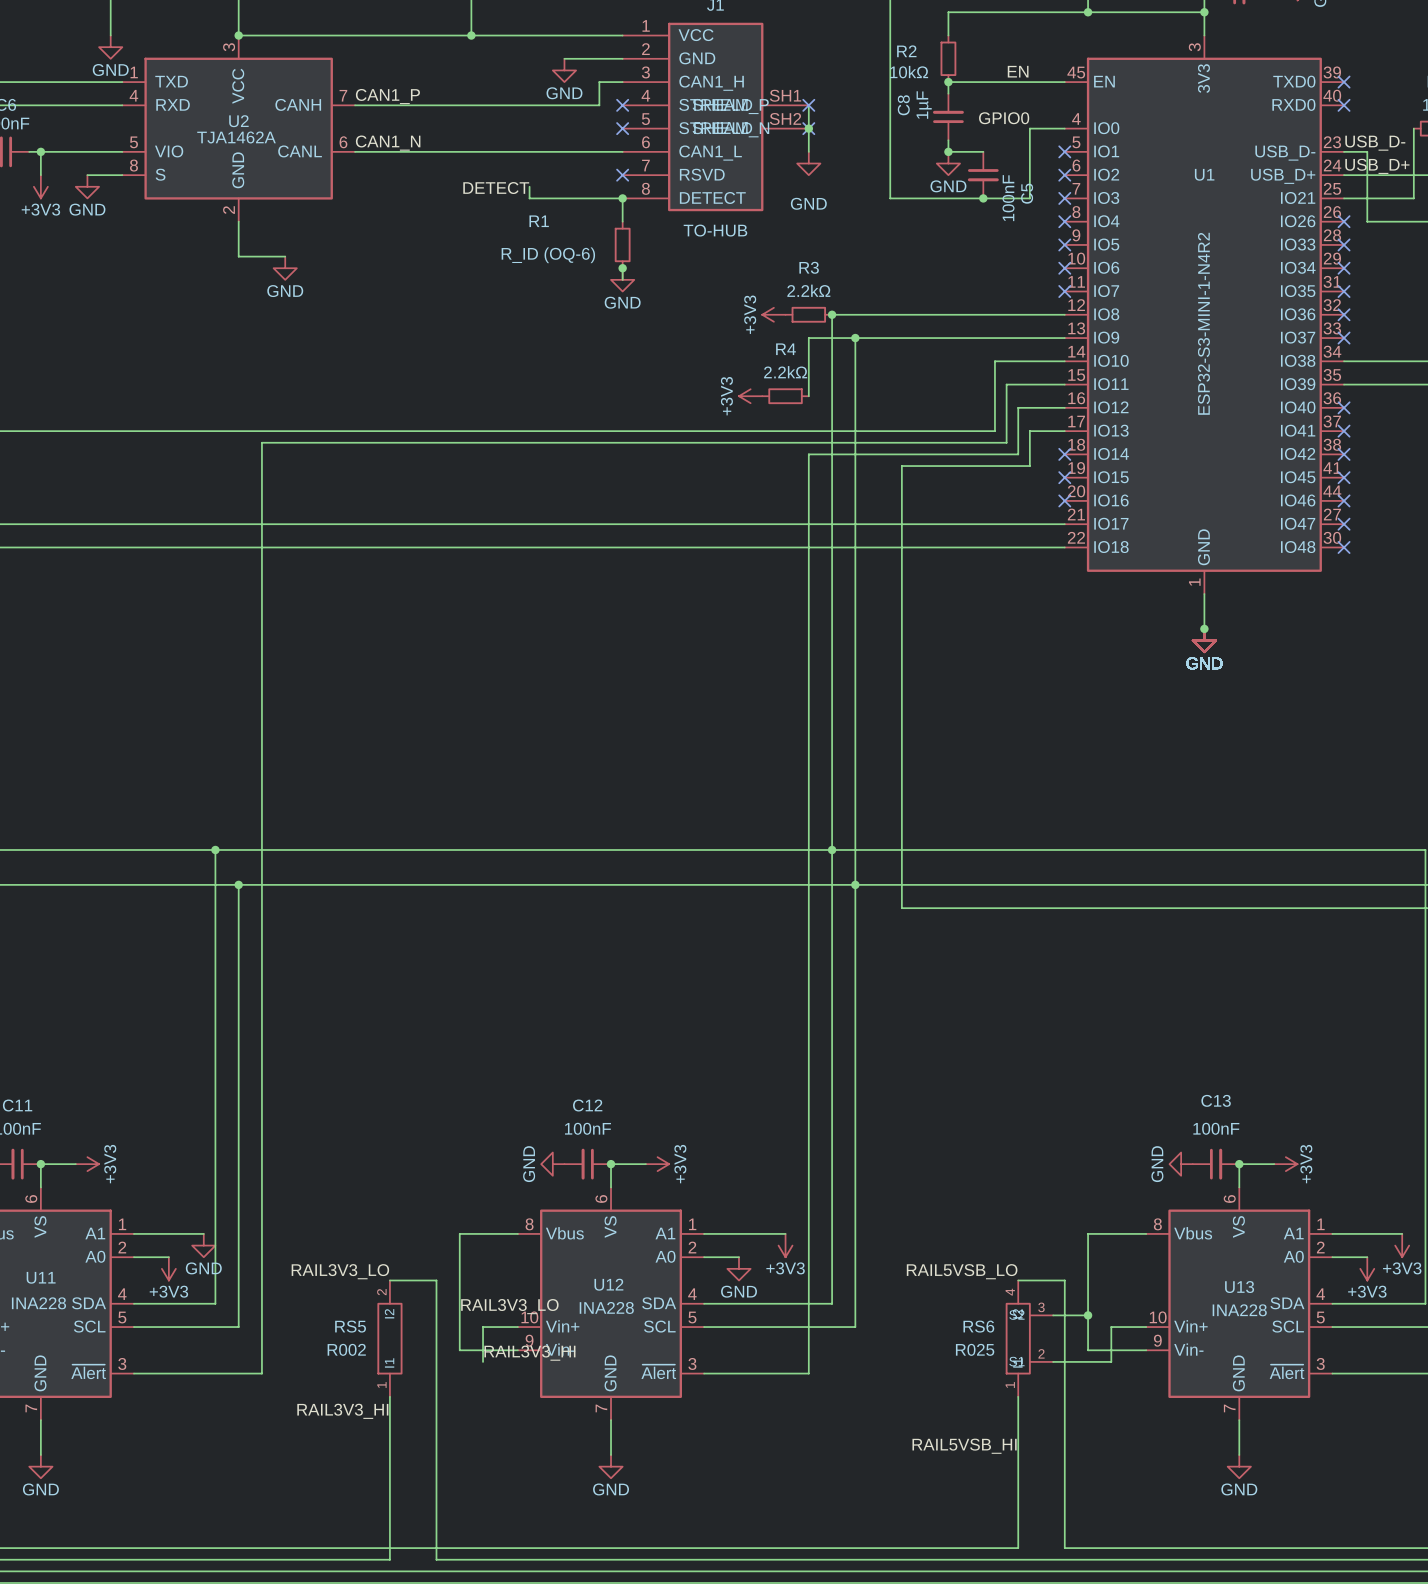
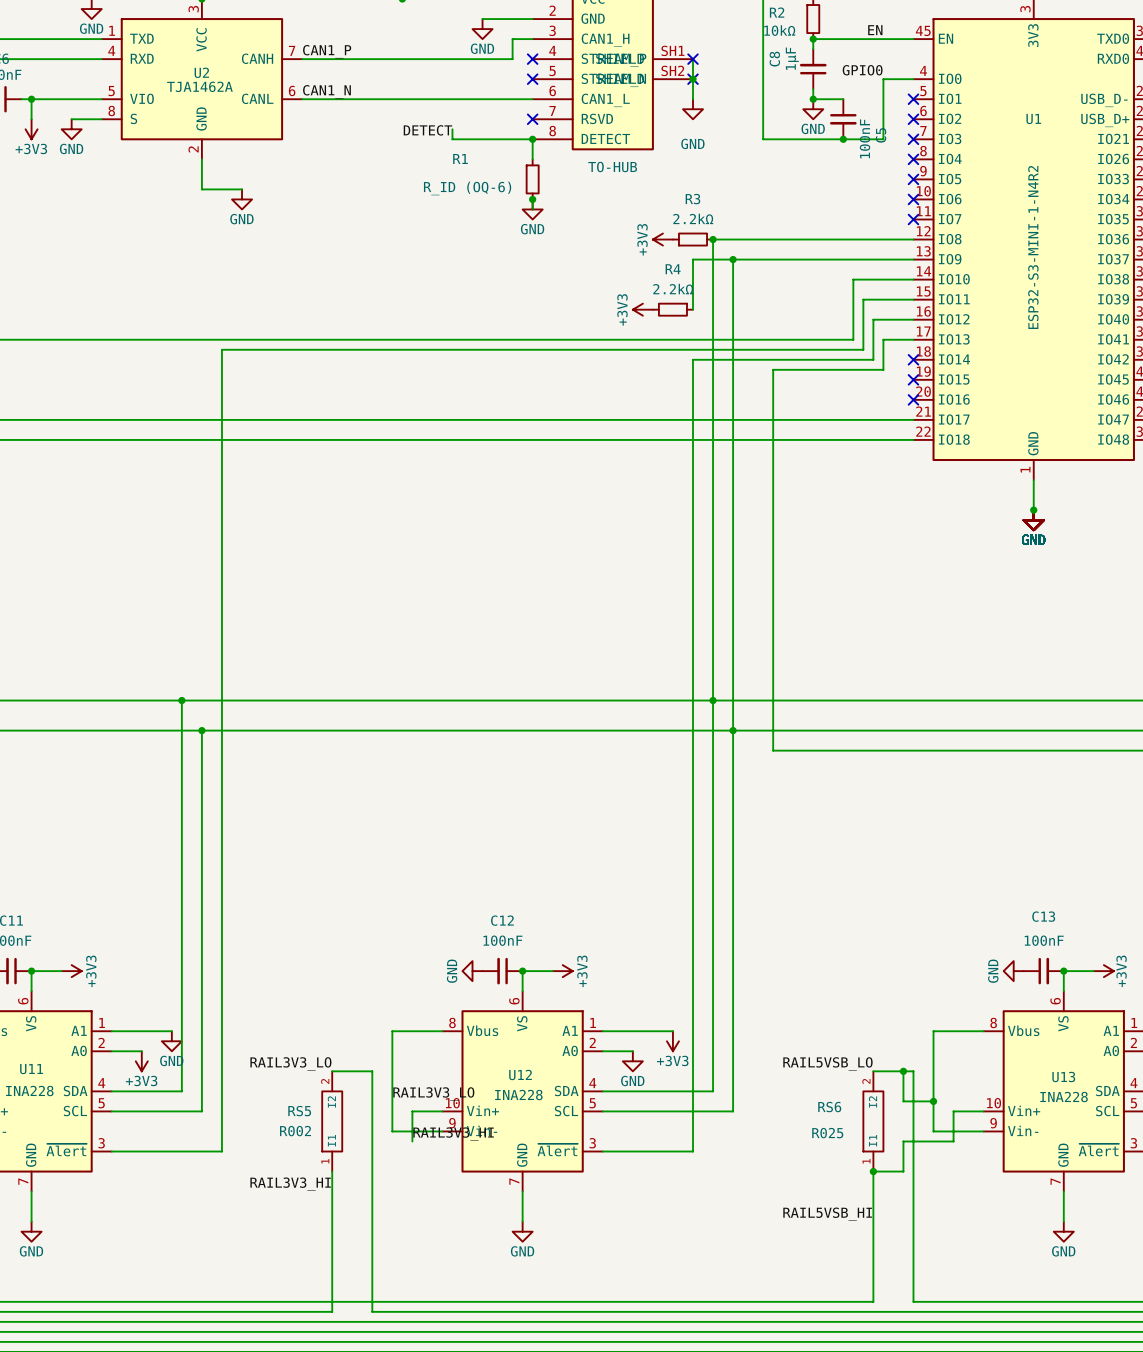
RS6 symbol: [1005, 1280, 1054, 1397] -> [862, 1071, 885, 1172]
wire: none -> (903, 1071) (903, 1101)
junction: none -> (903, 1071)
wire: none -> (903, 1141) (903, 1171) (873, 1171)
junction: none -> (873, 1171)

